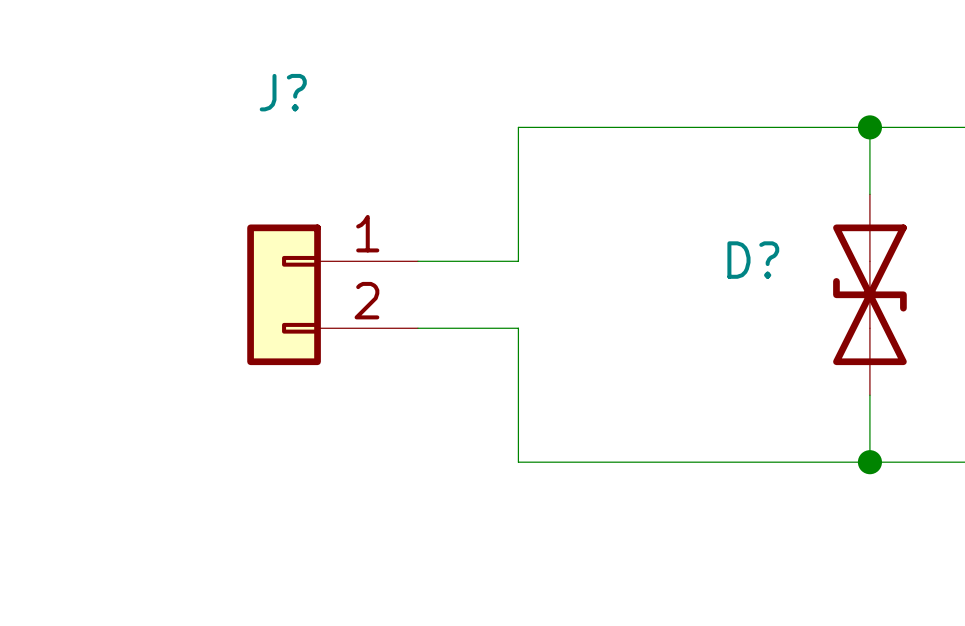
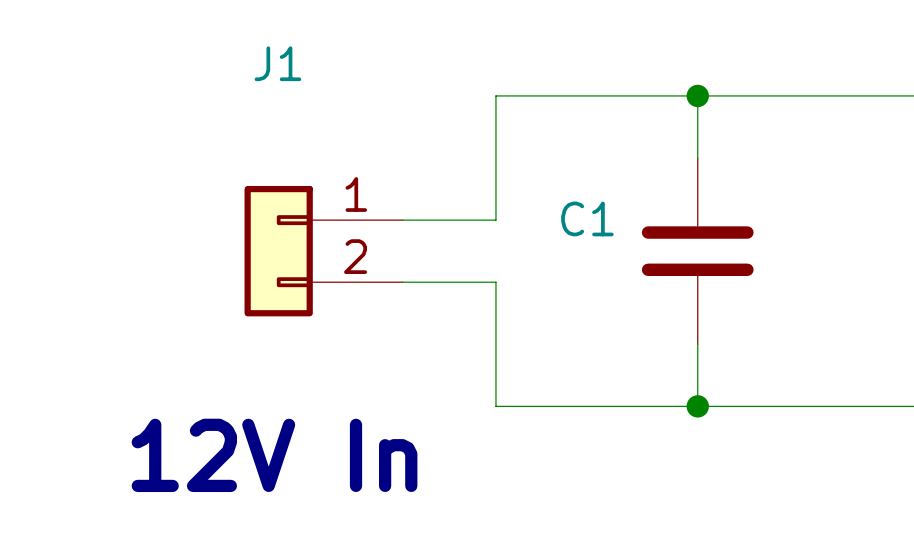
J? name: J? (283, 92) -> J1 (277, 63)
wire: (869, 127) (869, 194) -> (697, 95) (697, 158)
junction position: (869, 127) -> (697, 95)
C1: none -> (697, 251)
D?: (869, 294) -> none
wire: (869, 395) (869, 462) -> (697, 344) (697, 406)
junction position: (869, 462) -> (697, 406)
text: none -> 12V In (274, 455)

